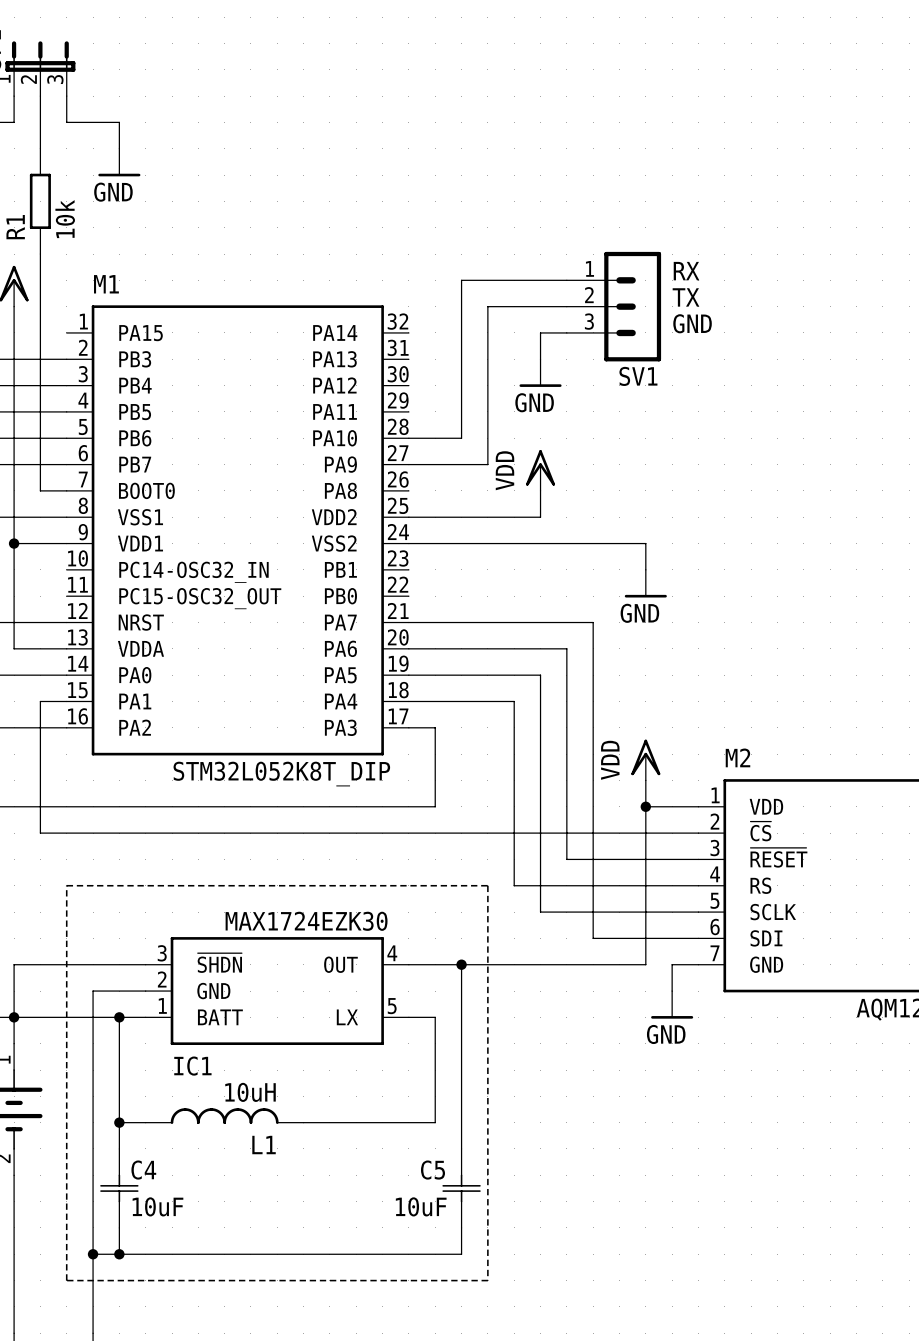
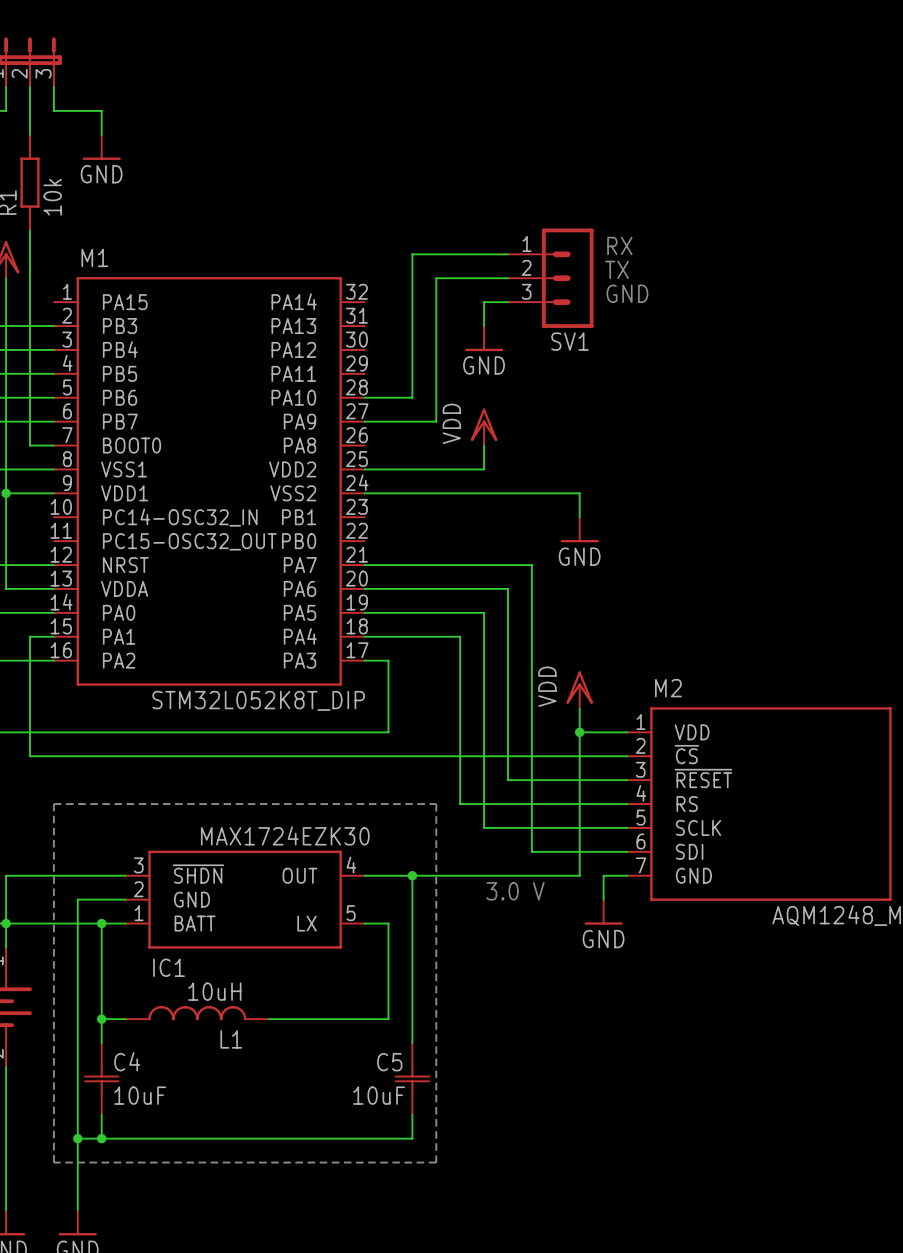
text: none -> 3.0 V (515, 891)

